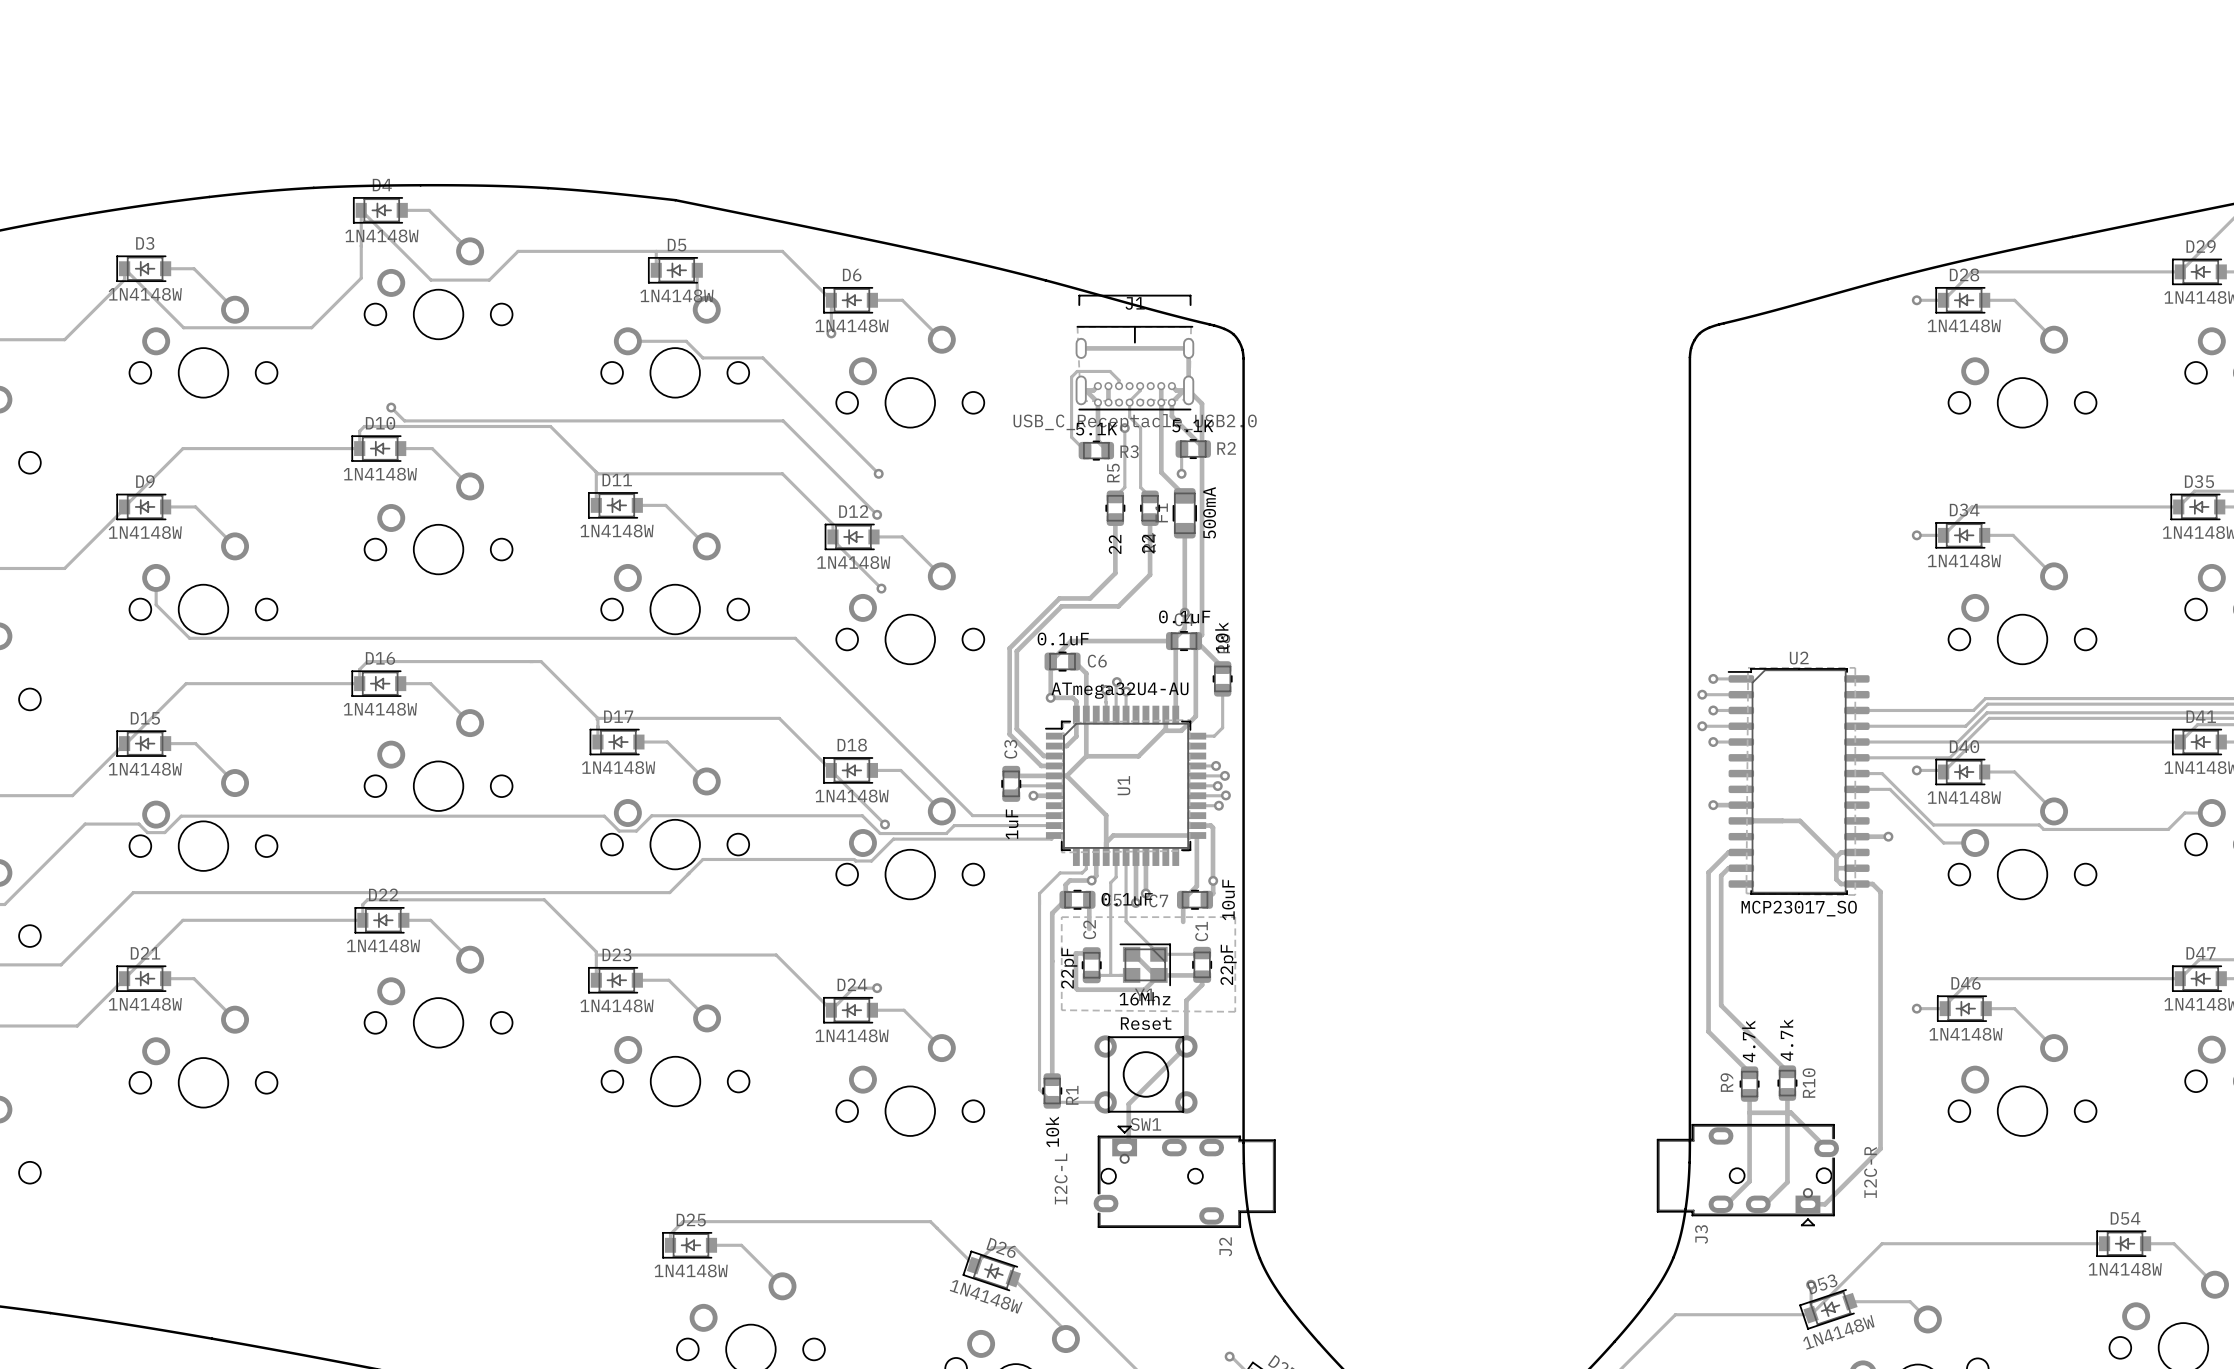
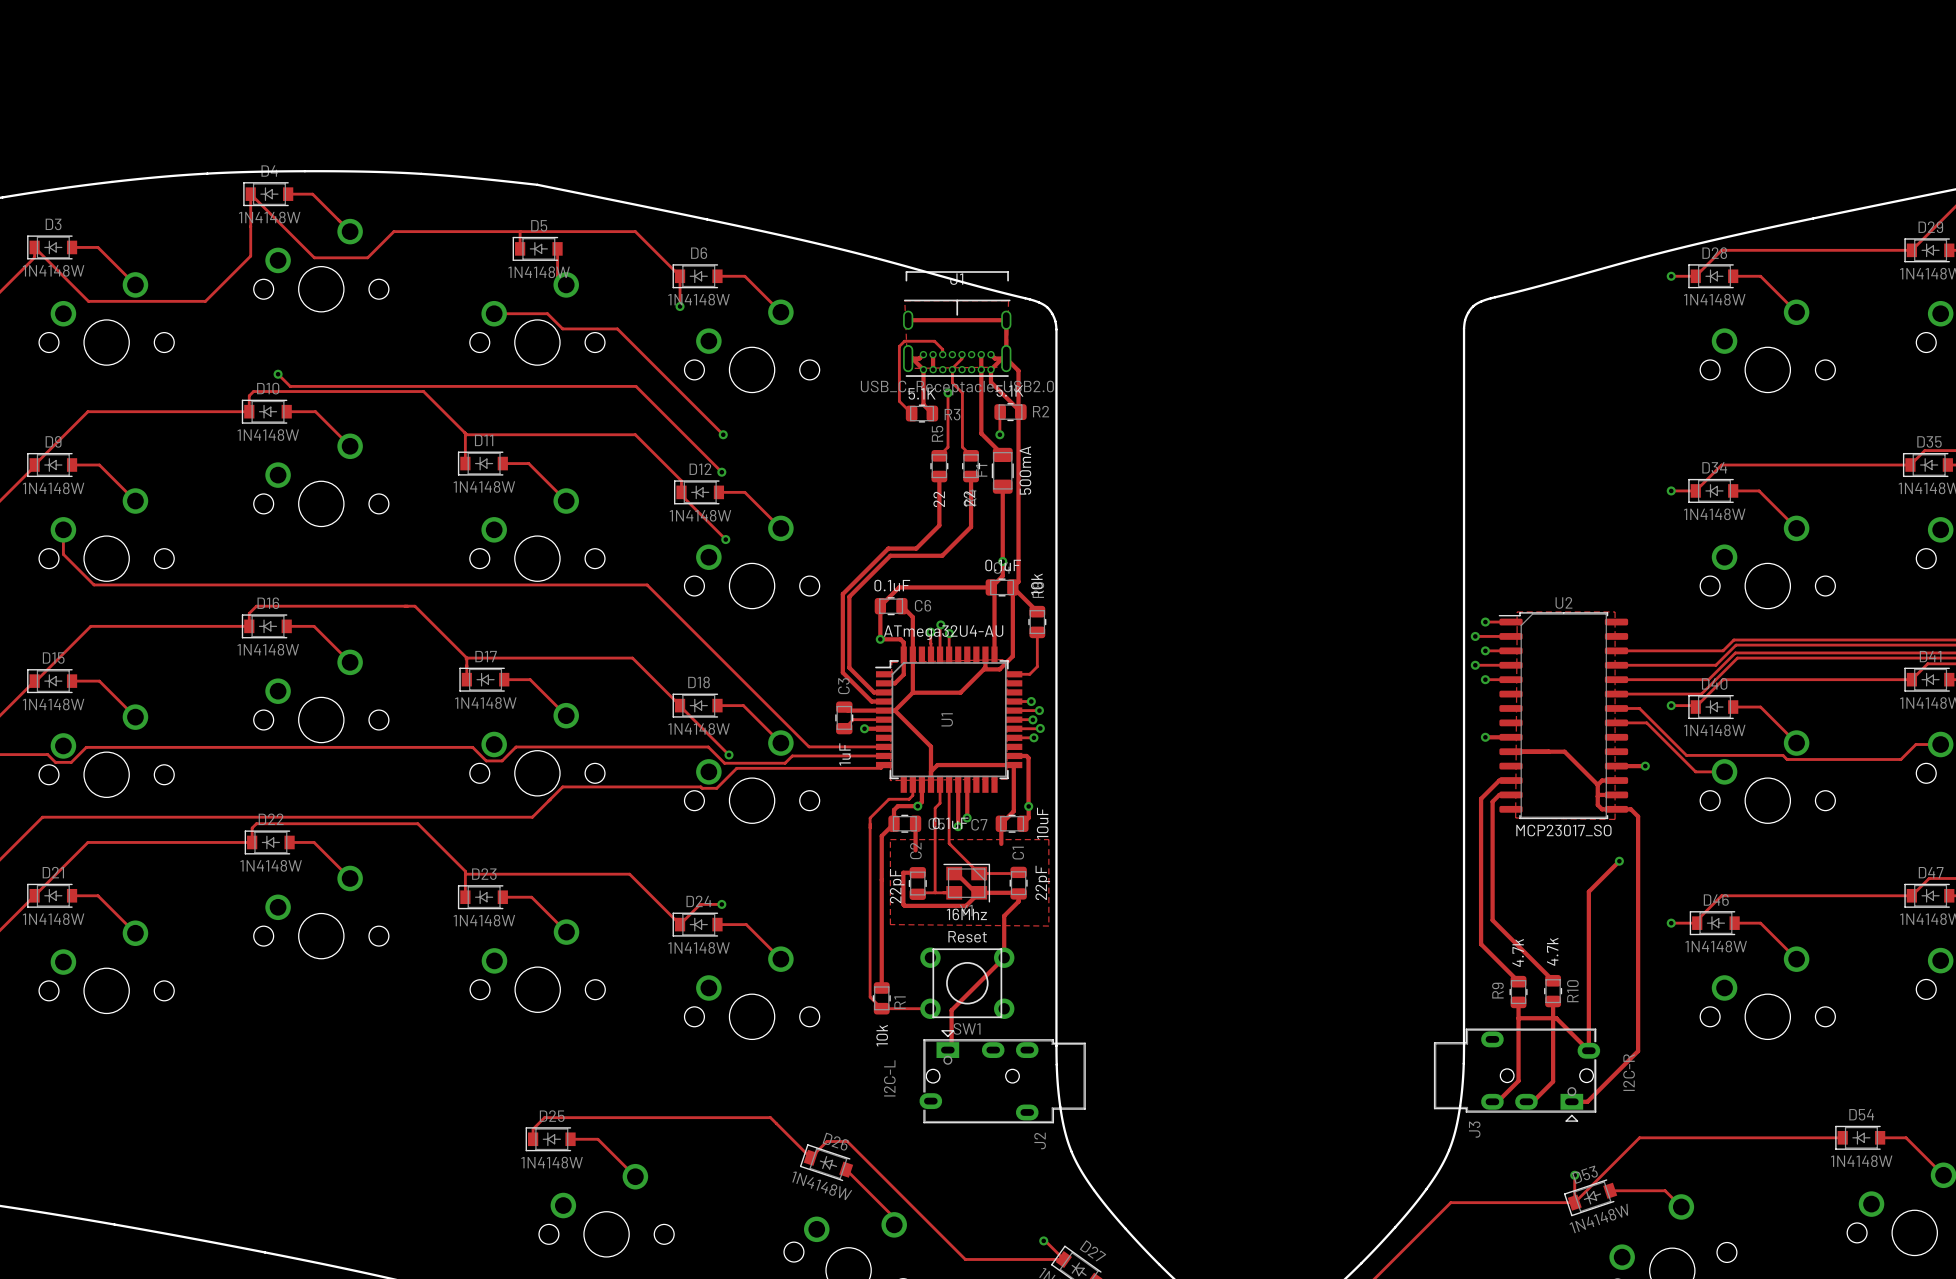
track: none -> (1619, 861) (1588, 891) (1588, 1050)
via: none -> (1619, 861)

